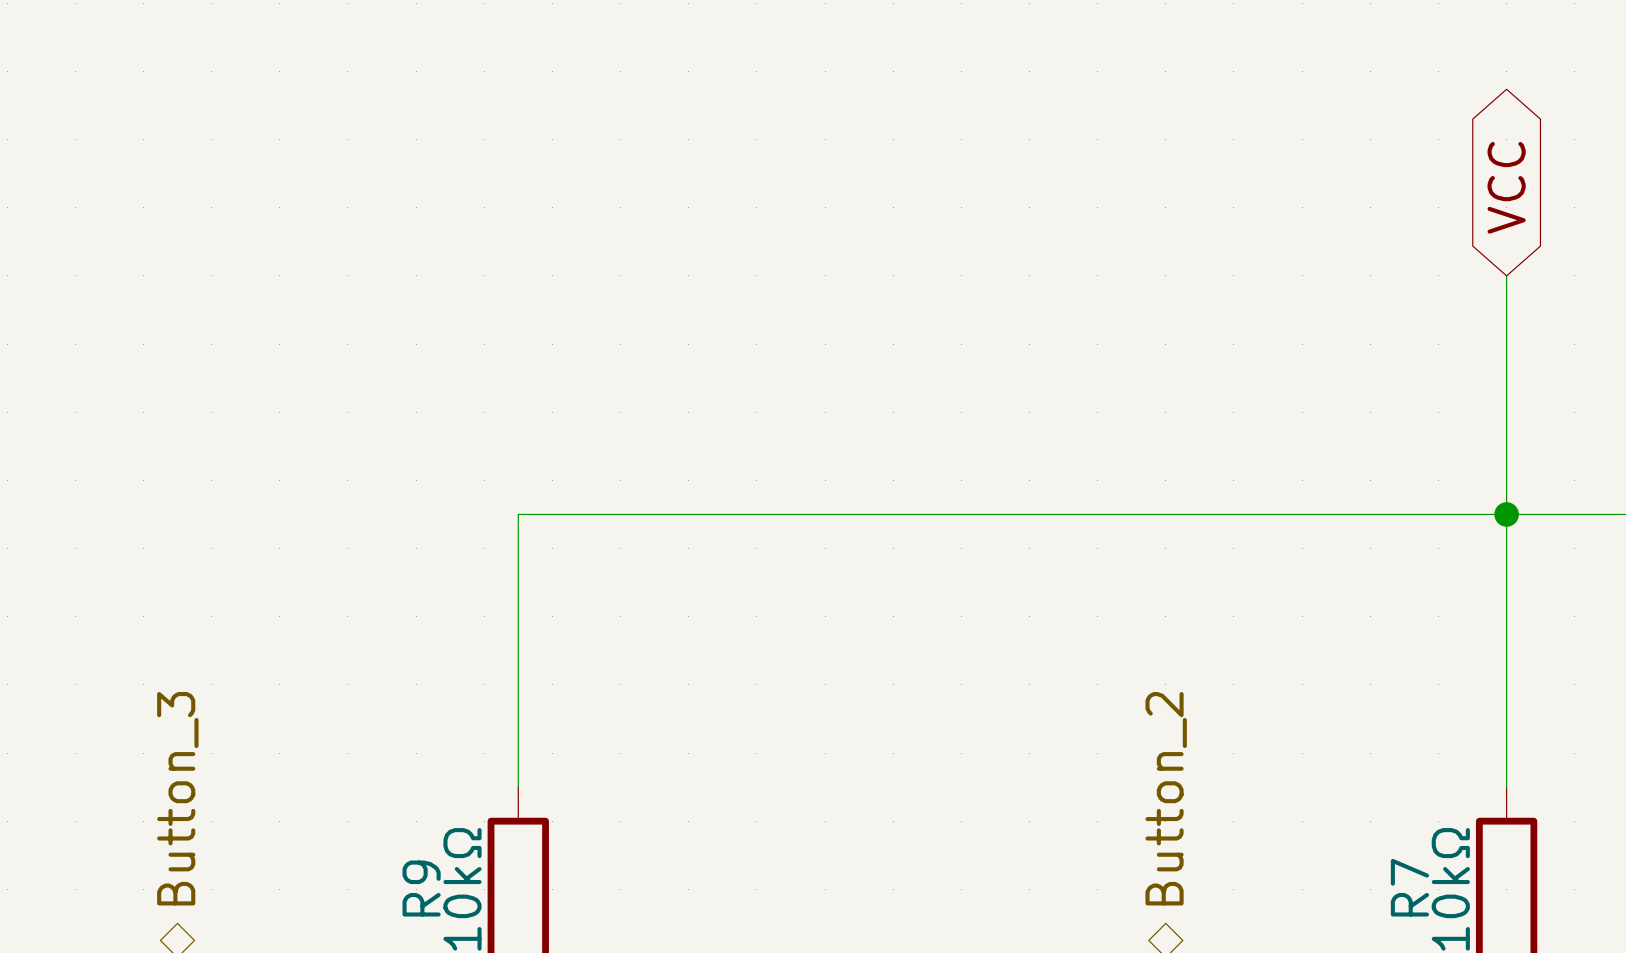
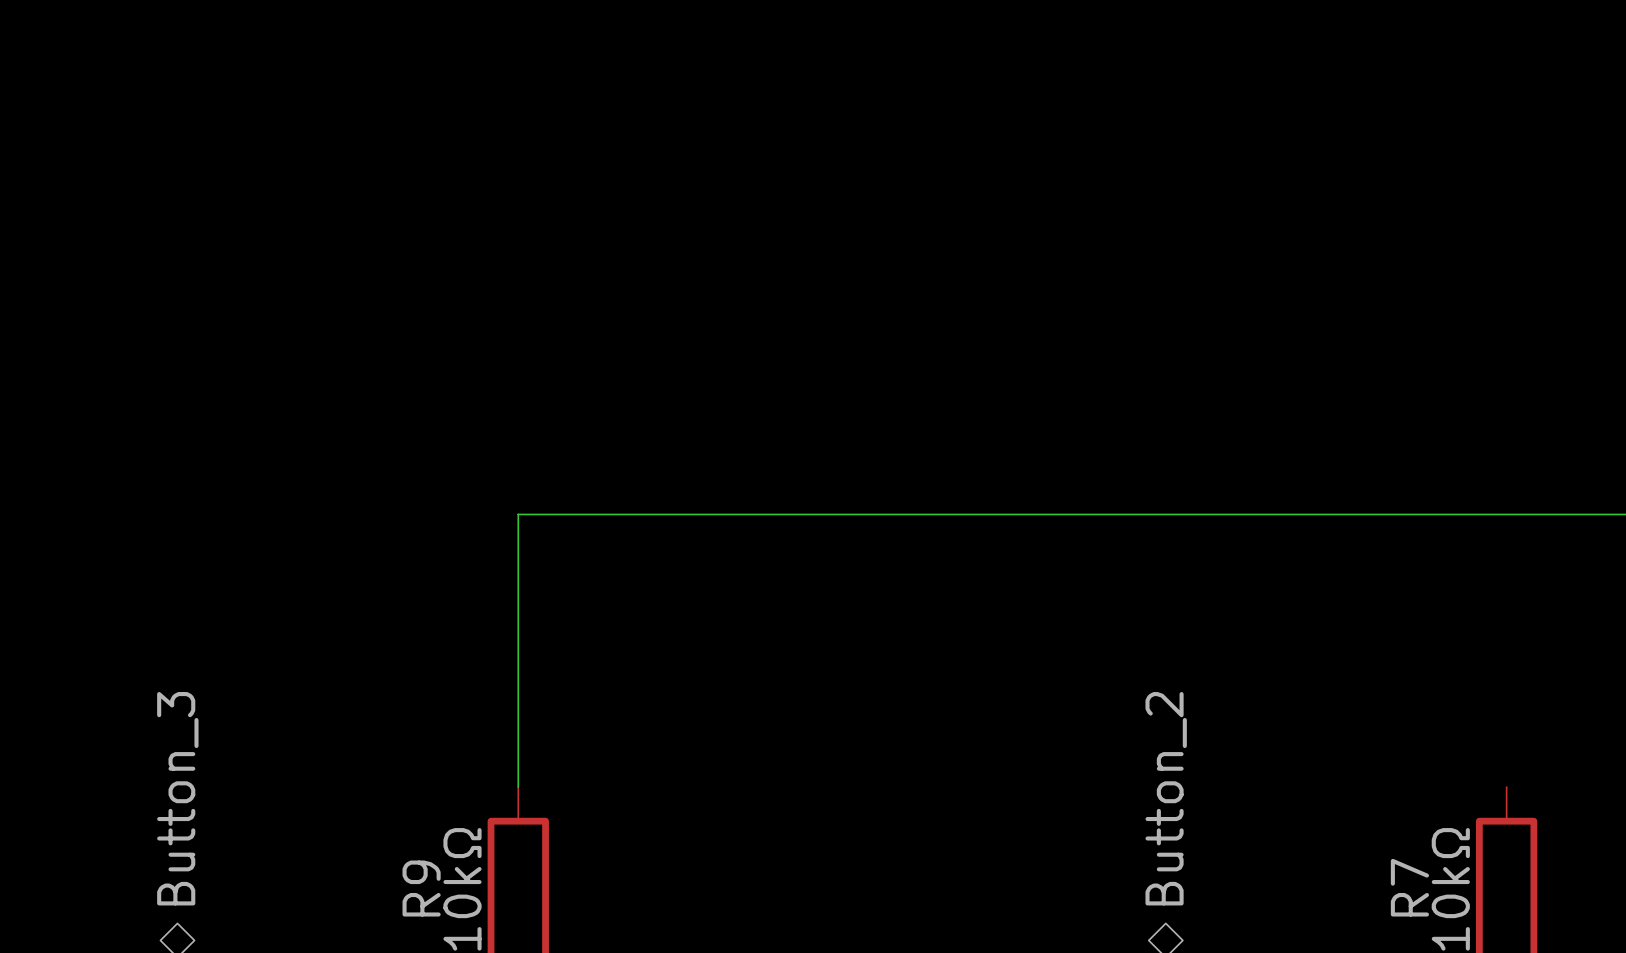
global label: VCC (1506, 187) -> none
wire: (1506, 275) (1506, 787) -> none
junction: (1506, 514) -> none

